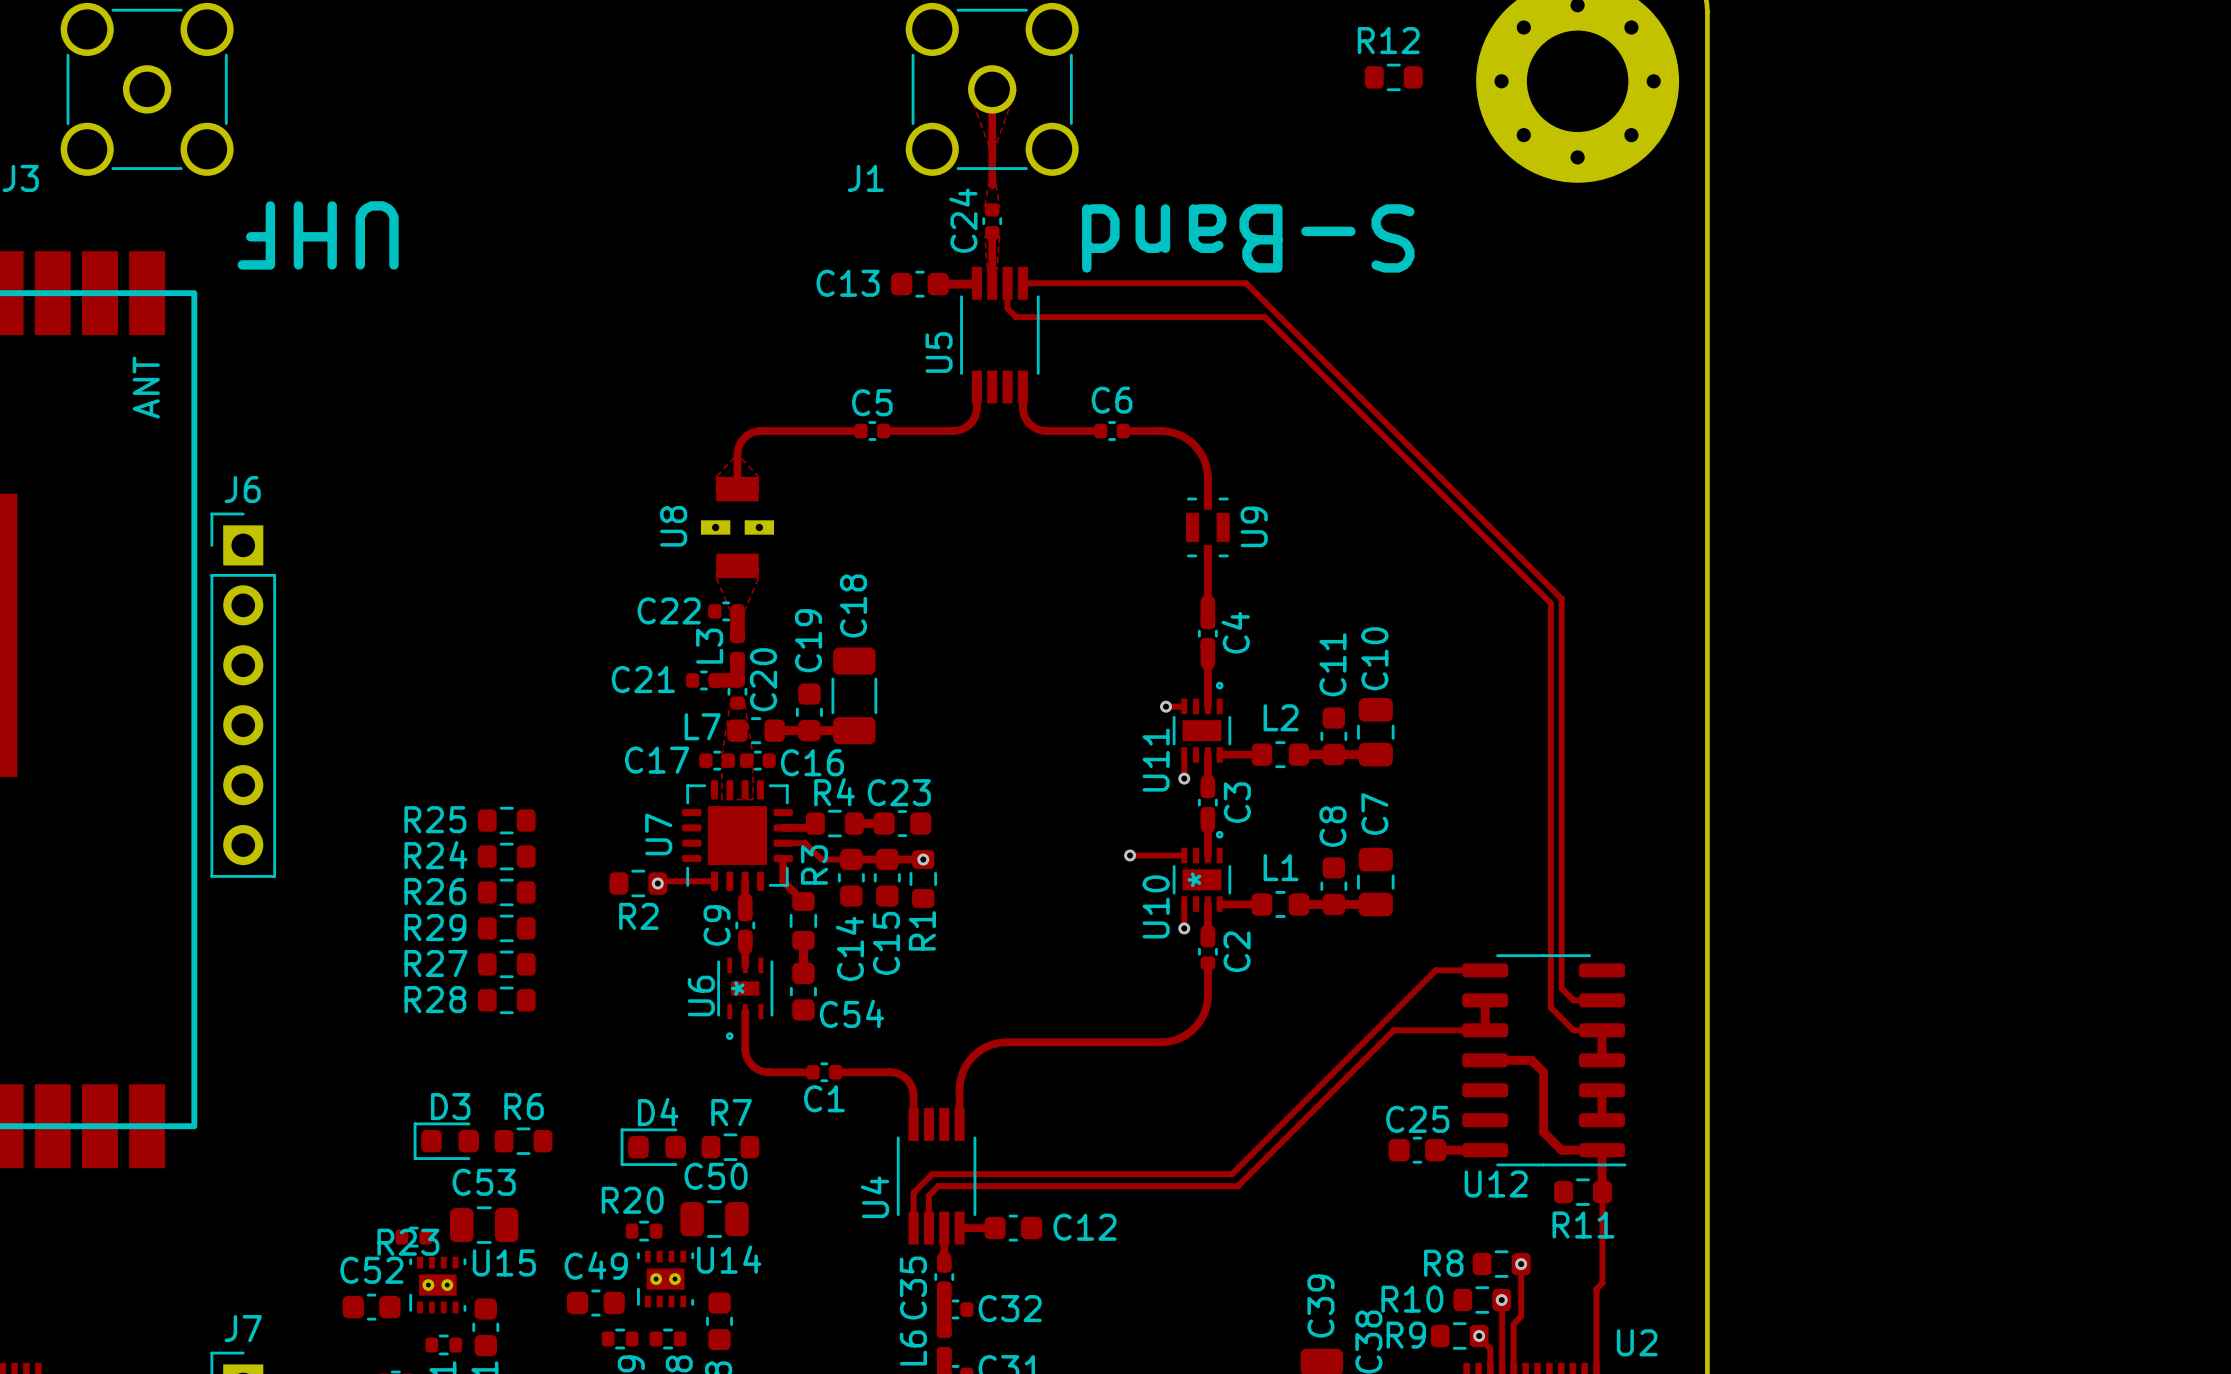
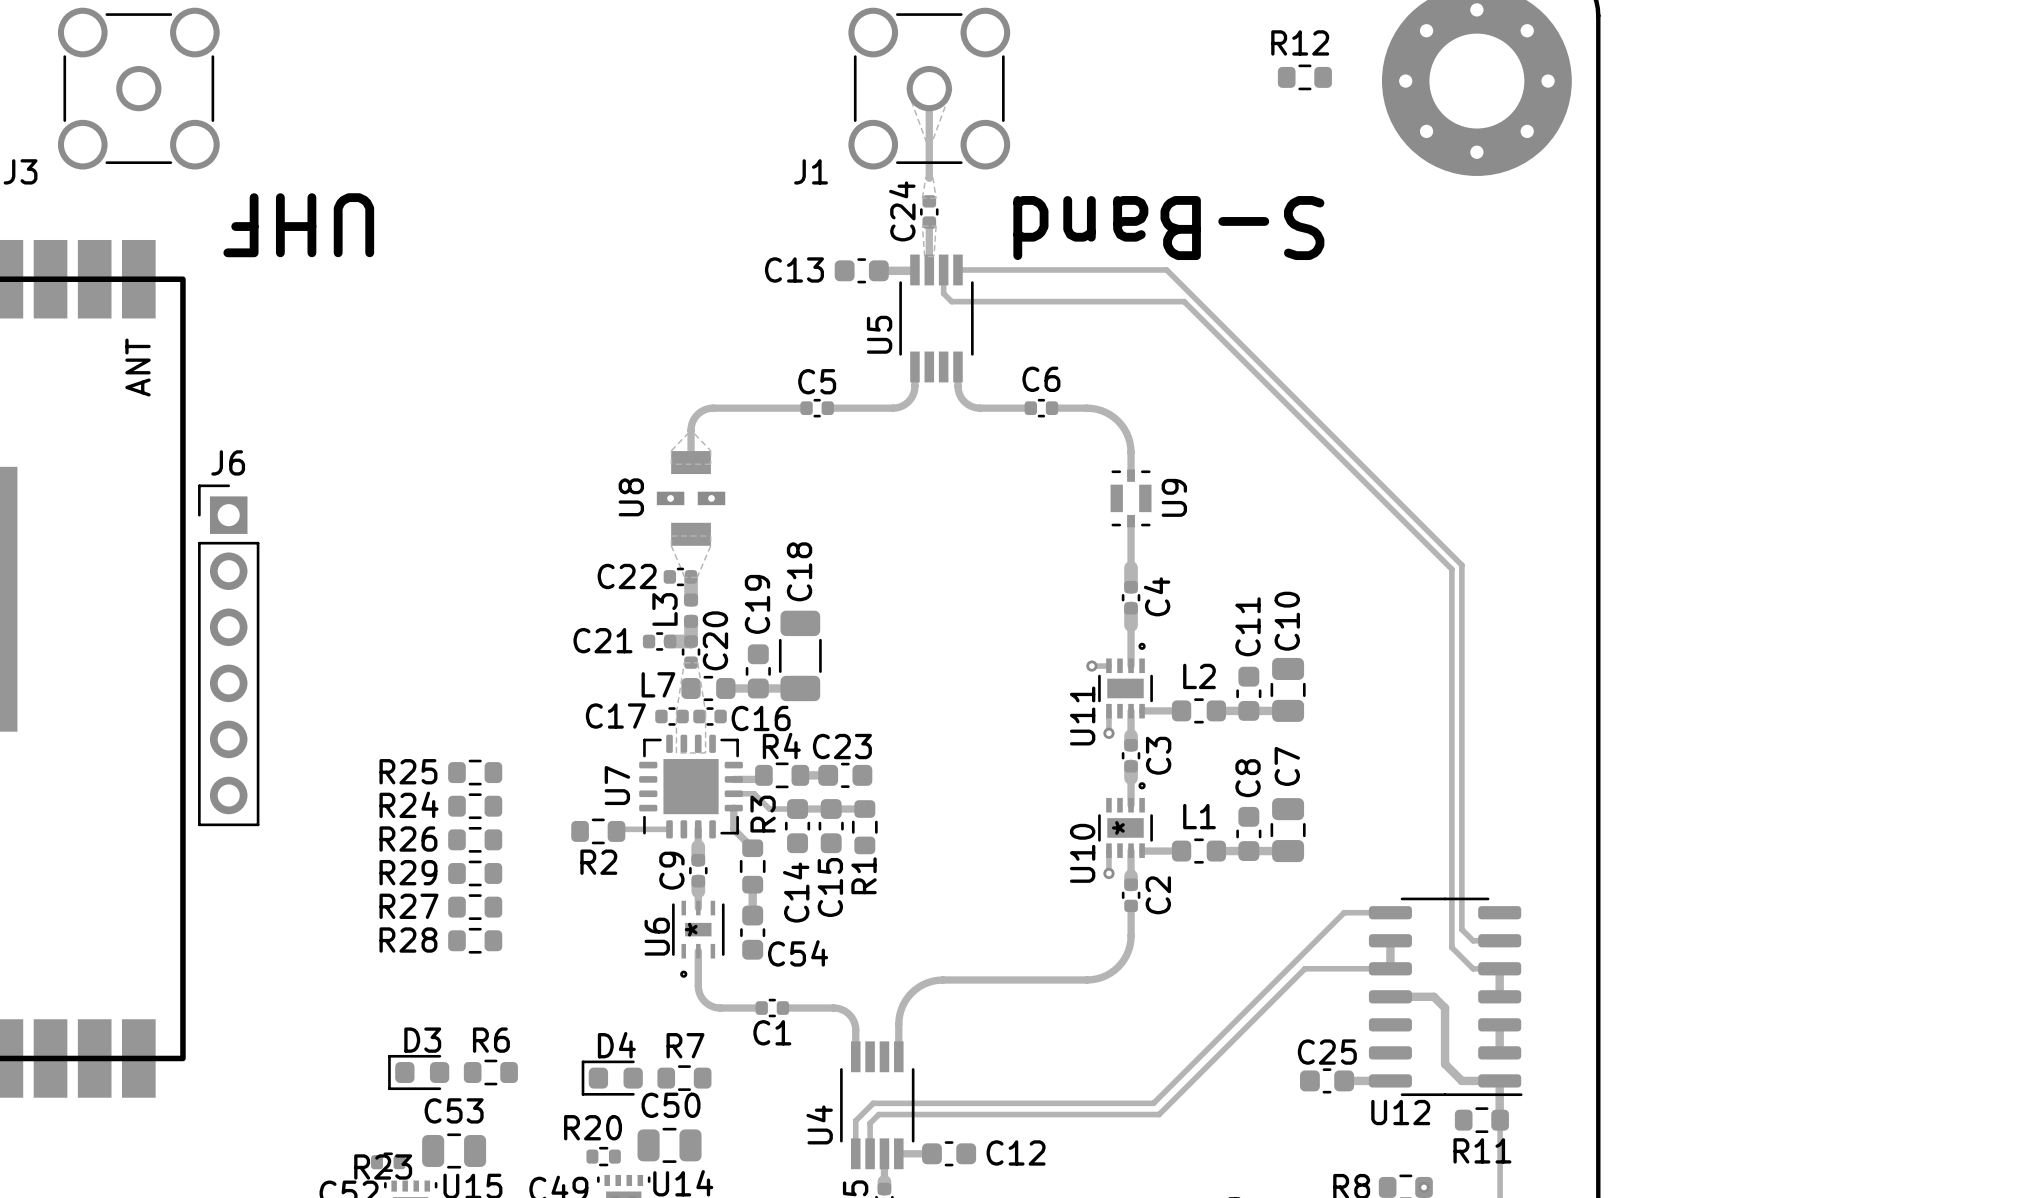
track: (1130, 855) (1184, 855) -> none
via: (1130, 855) -> none
via: (923, 859) -> none
via: (657, 883) -> none

